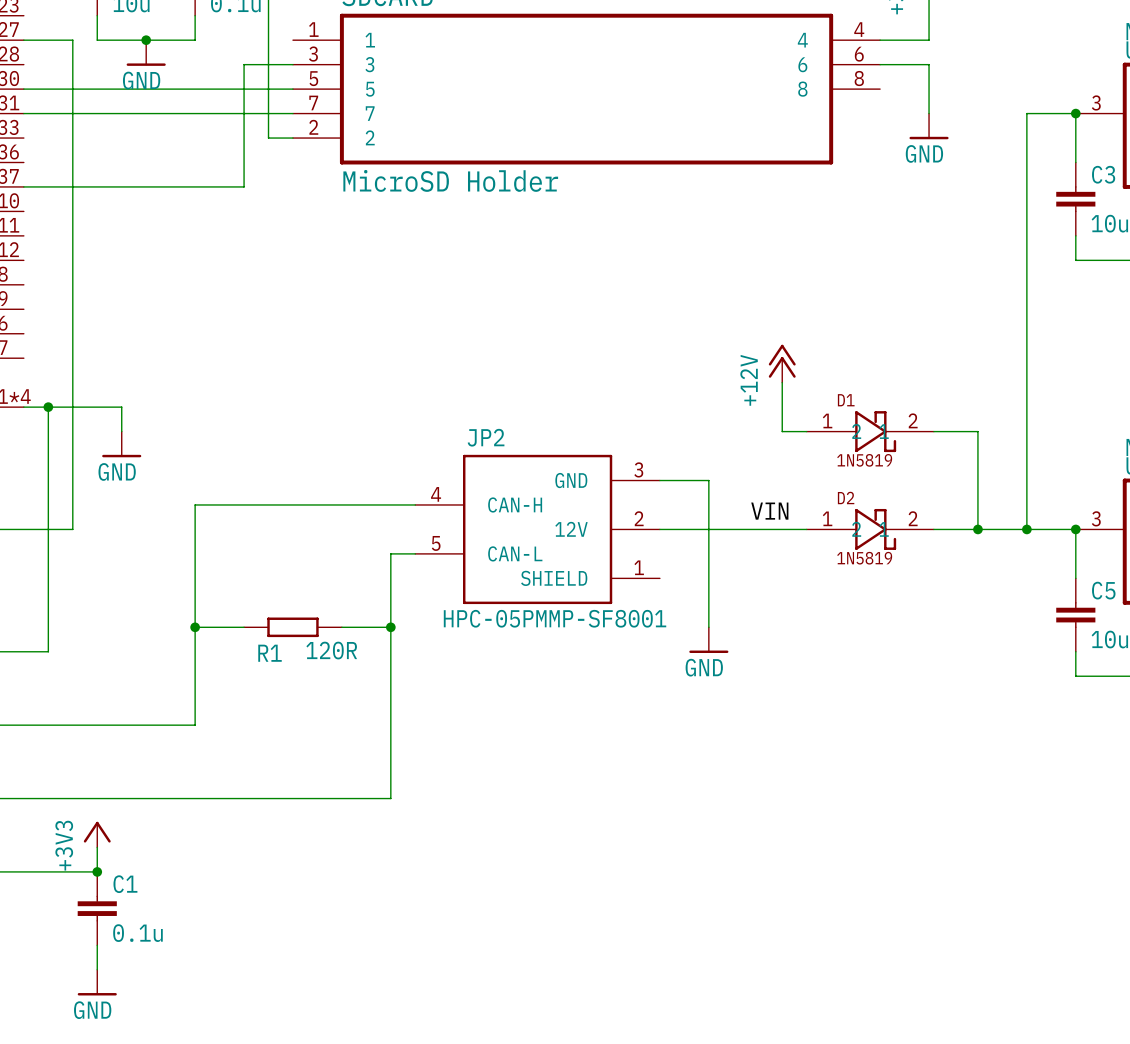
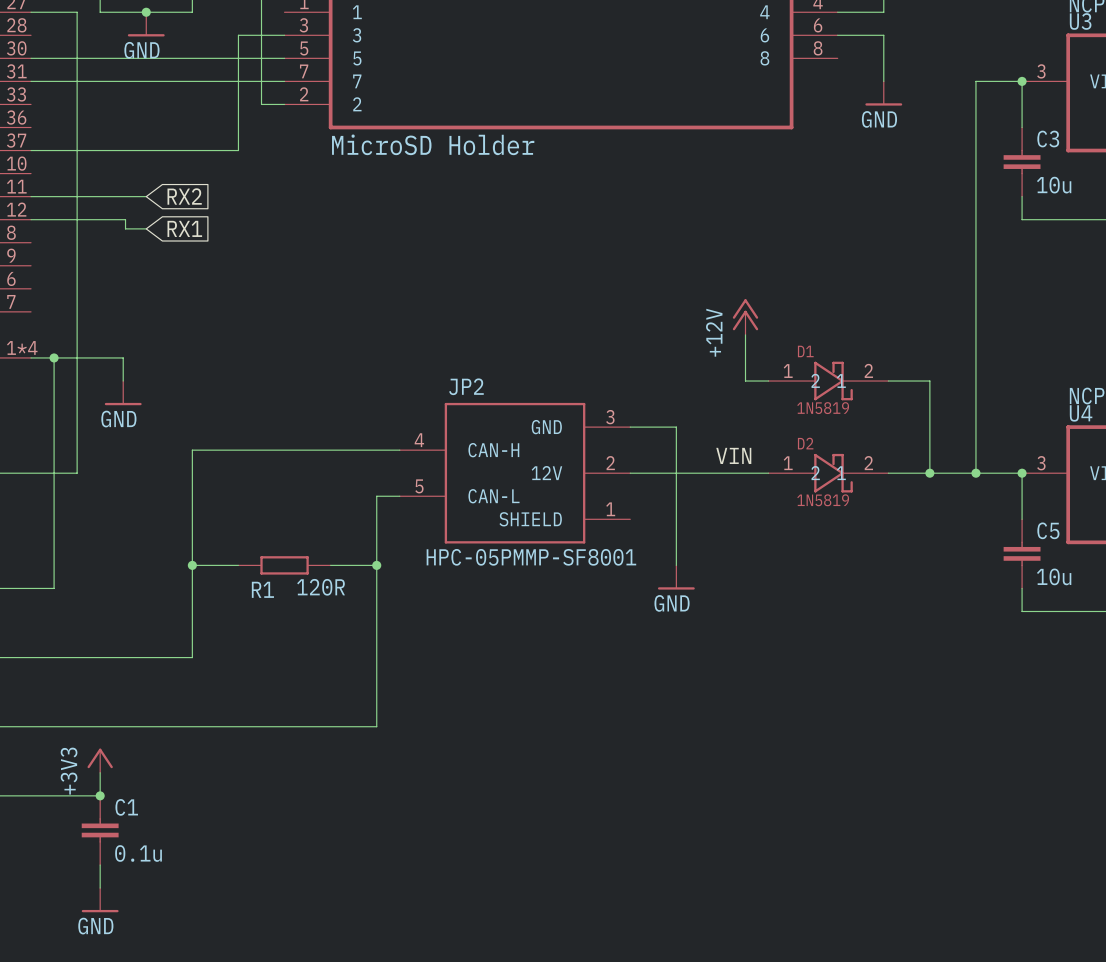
wire: none -> (31, 196) (146, 196)
global label: none -> RX2 (184, 196)
wire: none -> (31, 219) (125, 219) (125, 228) (146, 228)
global label: none -> RX1 (184, 228)

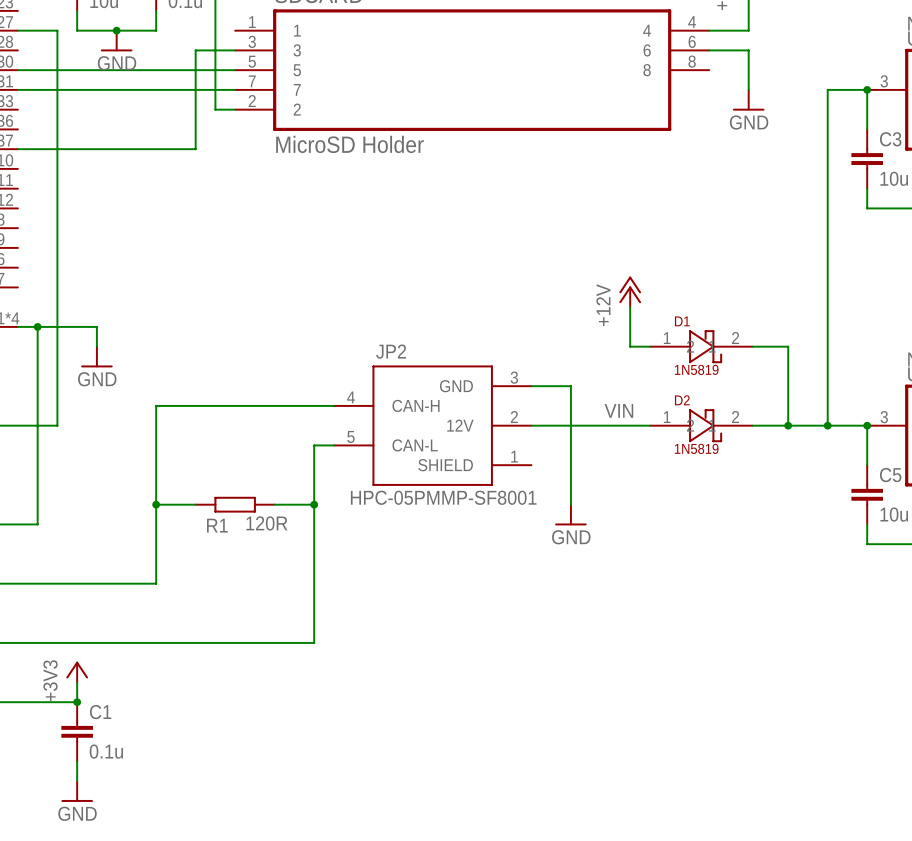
wire: (31, 196) (146, 196) -> none
global label: RX2 (184, 196) -> none
wire: (31, 219) (125, 219) (125, 228) (146, 228) -> none
global label: RX1 (184, 228) -> none

